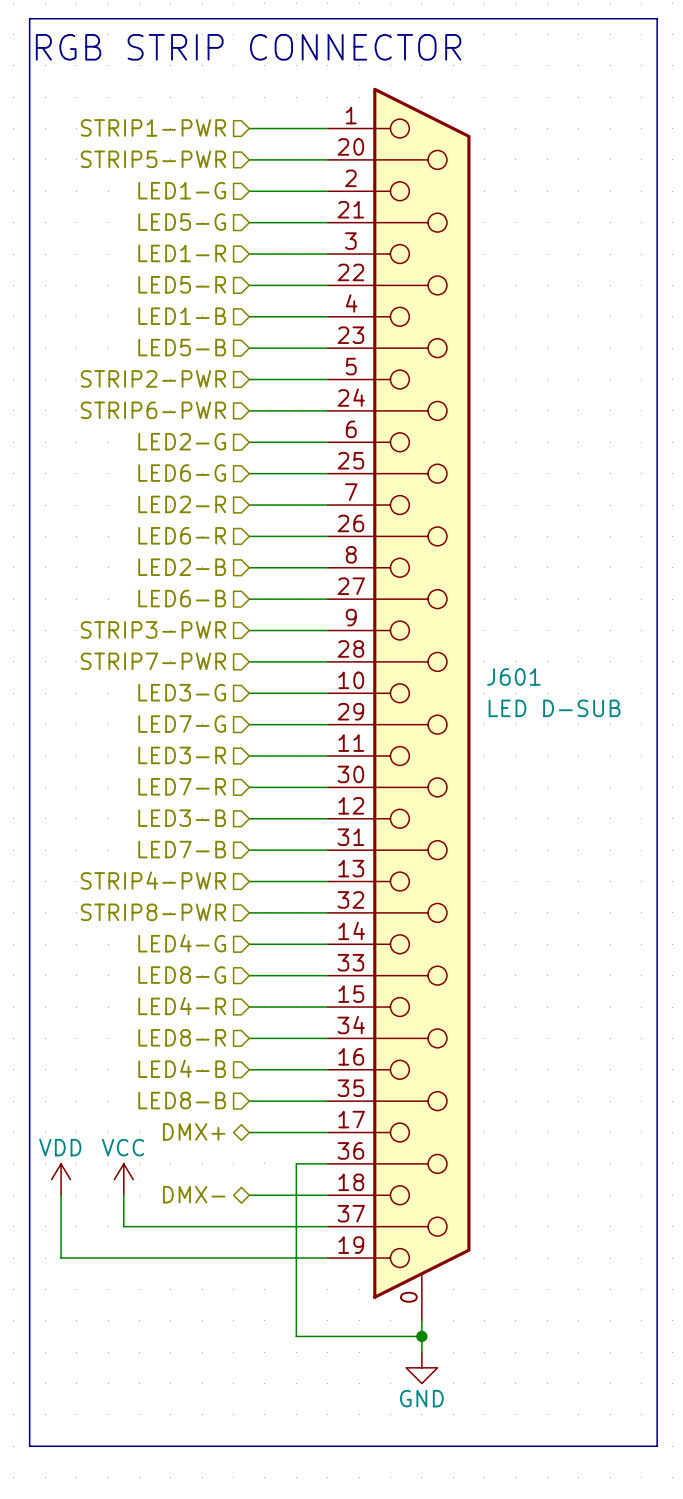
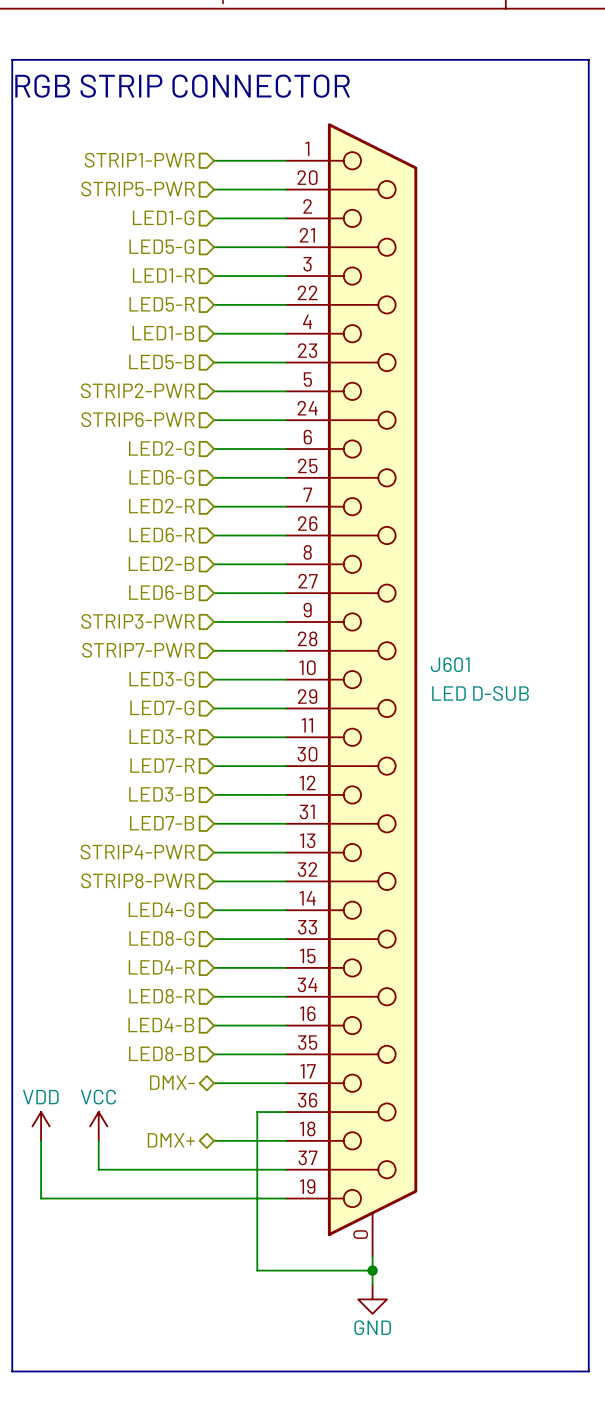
hierarchical label: DMX+ (194, 1131) -> DMX- (172, 1082)
hierarchical label: DMX- (194, 1194) -> DMX+ (171, 1140)

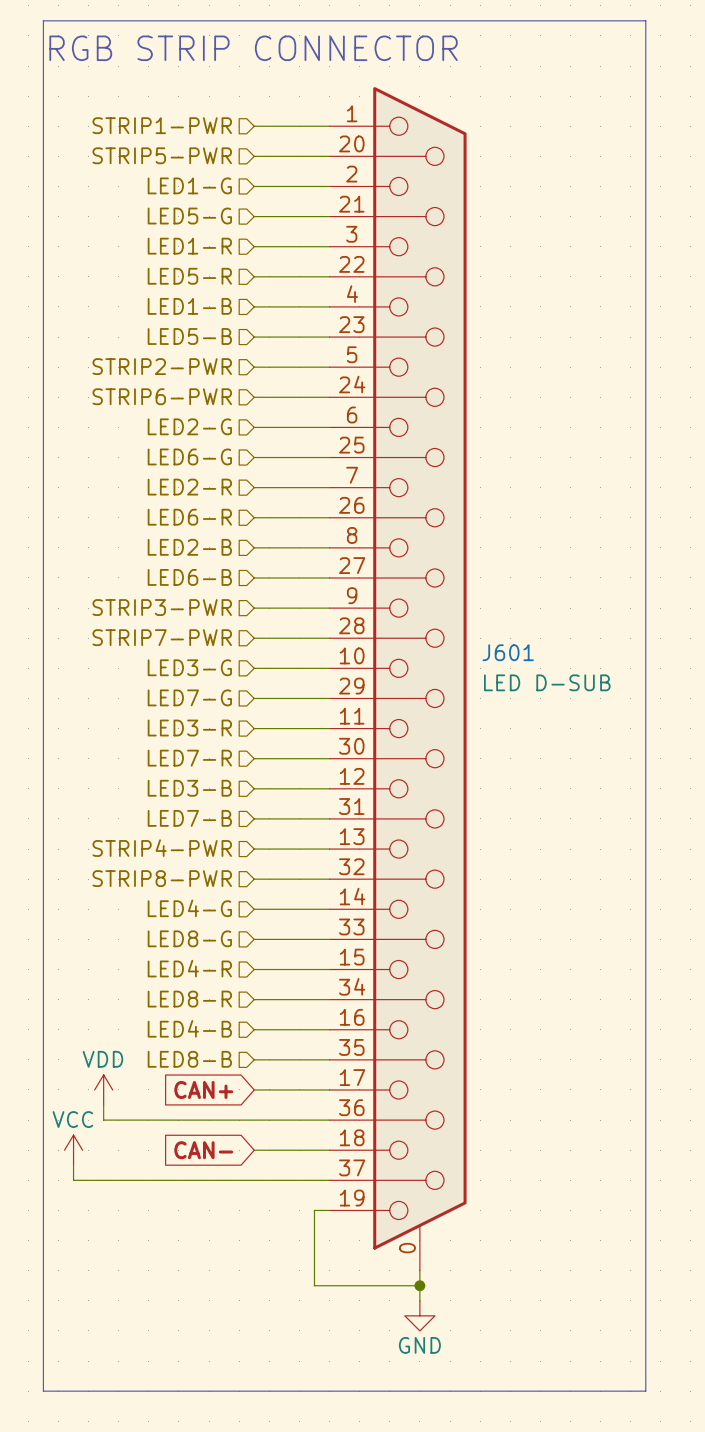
hierarchical label: DMX- (172, 1082) -> none
global label: none -> CAN+ (203, 1089)
wire: none -> (103, 1105) (103, 1120) (299, 1120)
wire: (257, 1112) (257, 1270) (271, 1270) -> (314, 1210) (314, 1285)
power symbol position: VDD (41, 1126) -> VDD (103, 1089)
power symbol position: VCC (98, 1126) -> VCC (73, 1150)
wire: (98, 1140) (98, 1169) -> (73, 1180) (133, 1180)
hierarchical label: DMX+ (171, 1140) -> none
global label: none -> CAN- (203, 1150)
wire: (41, 1169) (41, 1198) (271, 1198) -> none

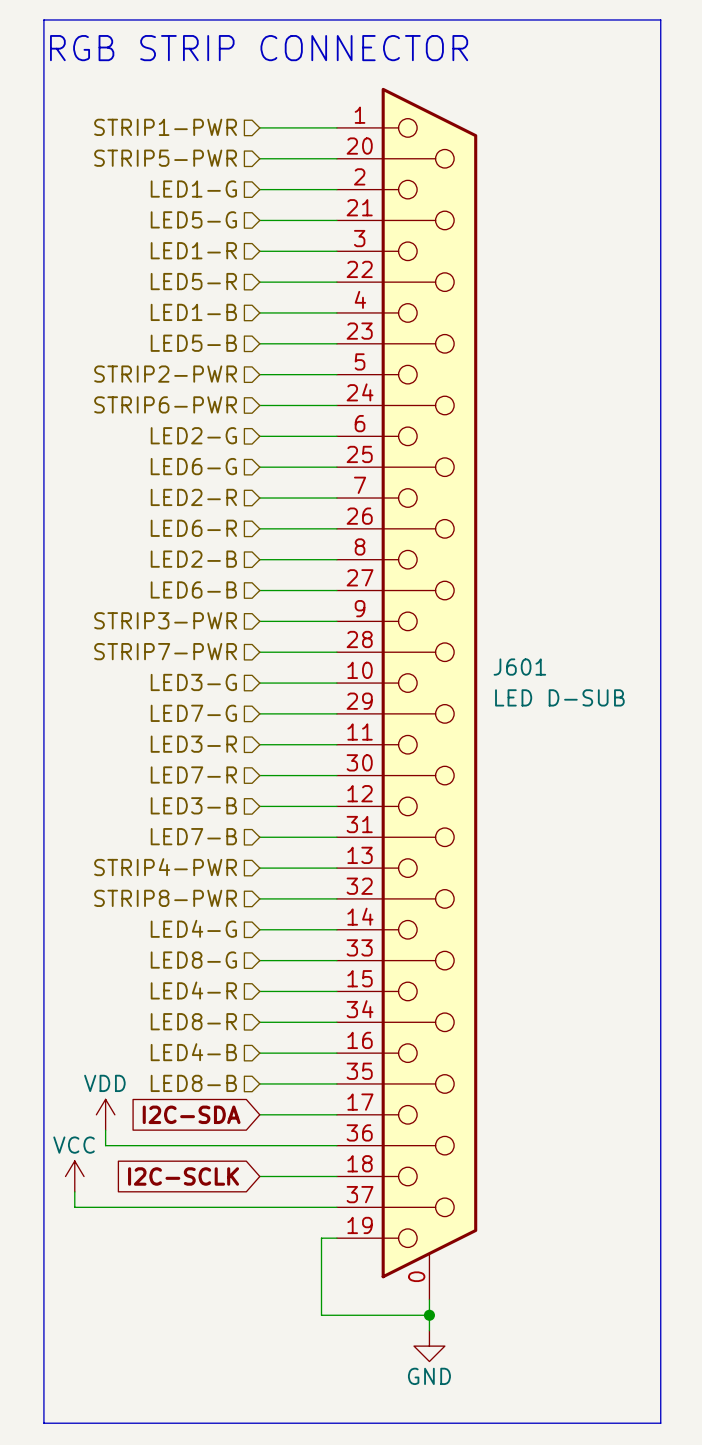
global label: CAN+ (203, 1089) -> I2C-SDA (191, 1114)
global label: CAN- (203, 1150) -> I2C-SCLK (183, 1176)

